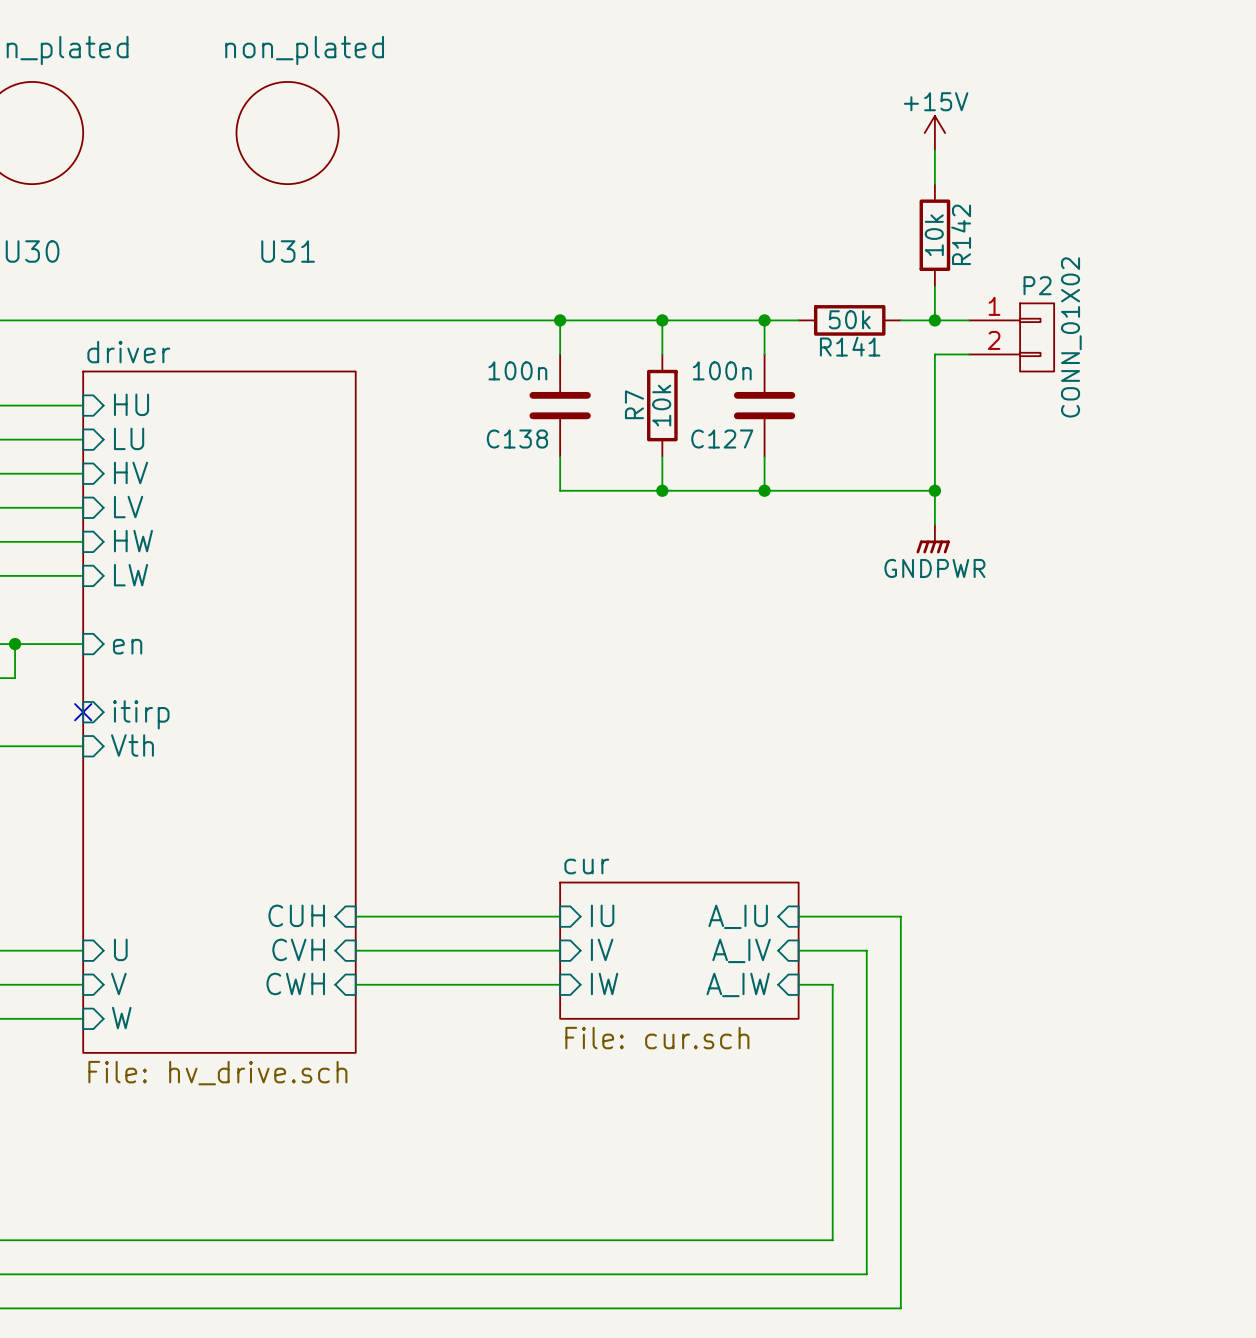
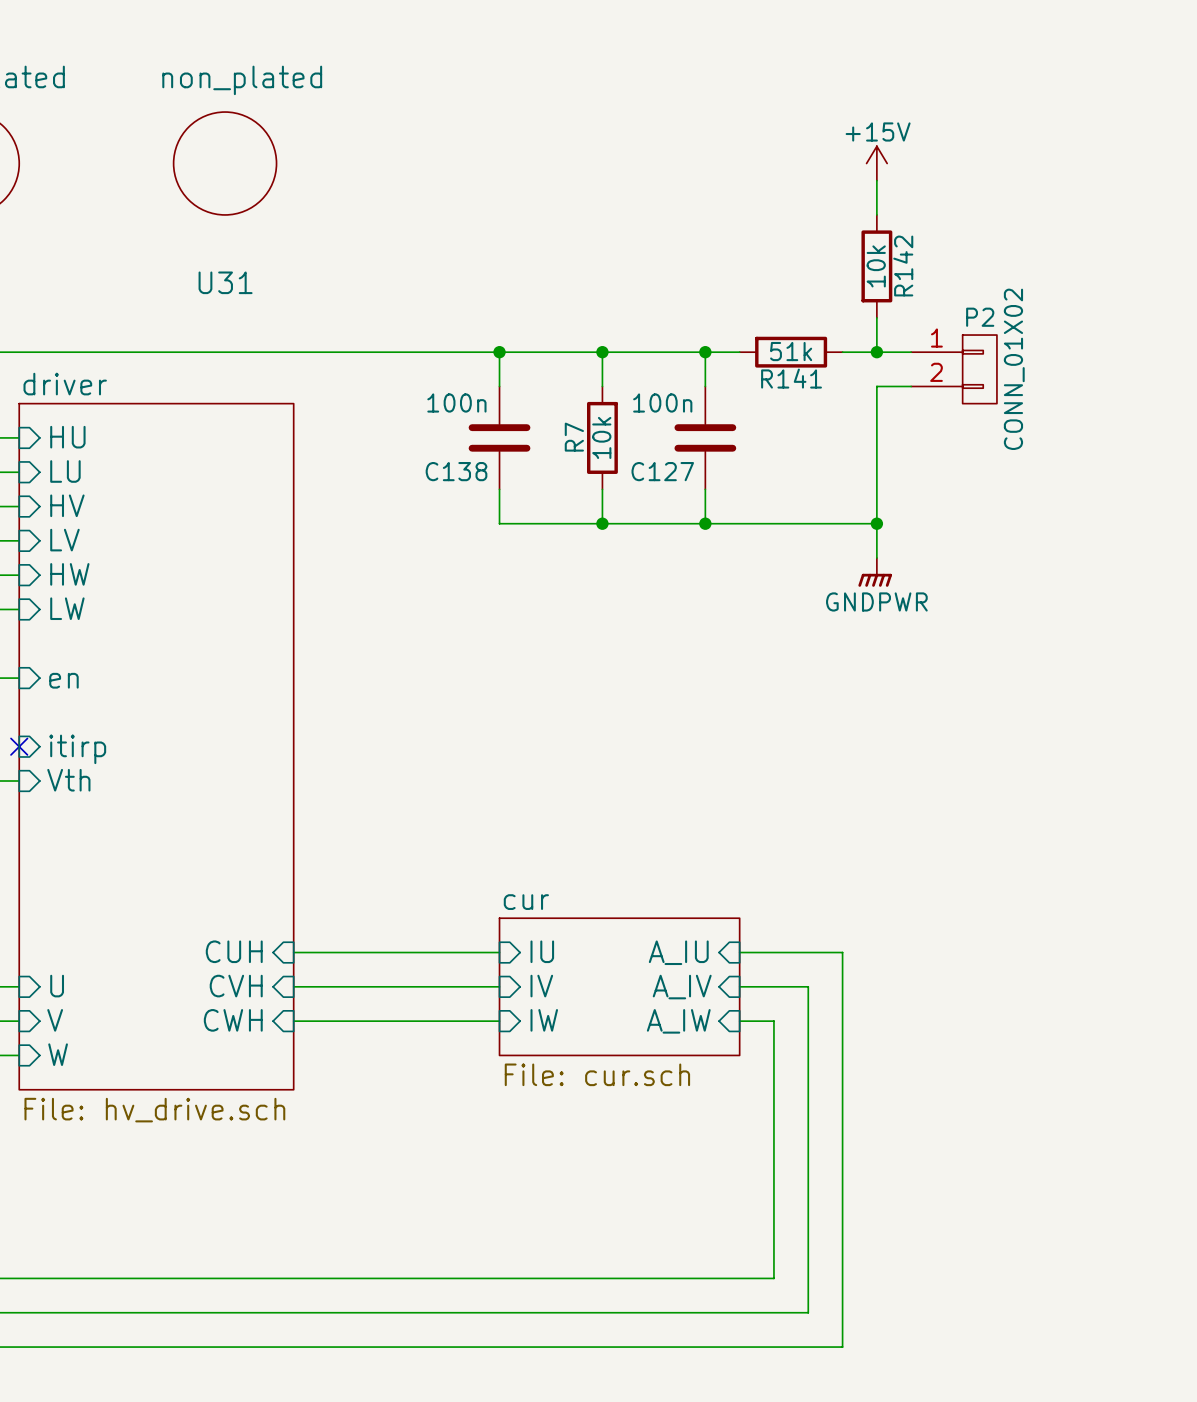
R141 value: 50k (849, 319) -> 51k (791, 351)

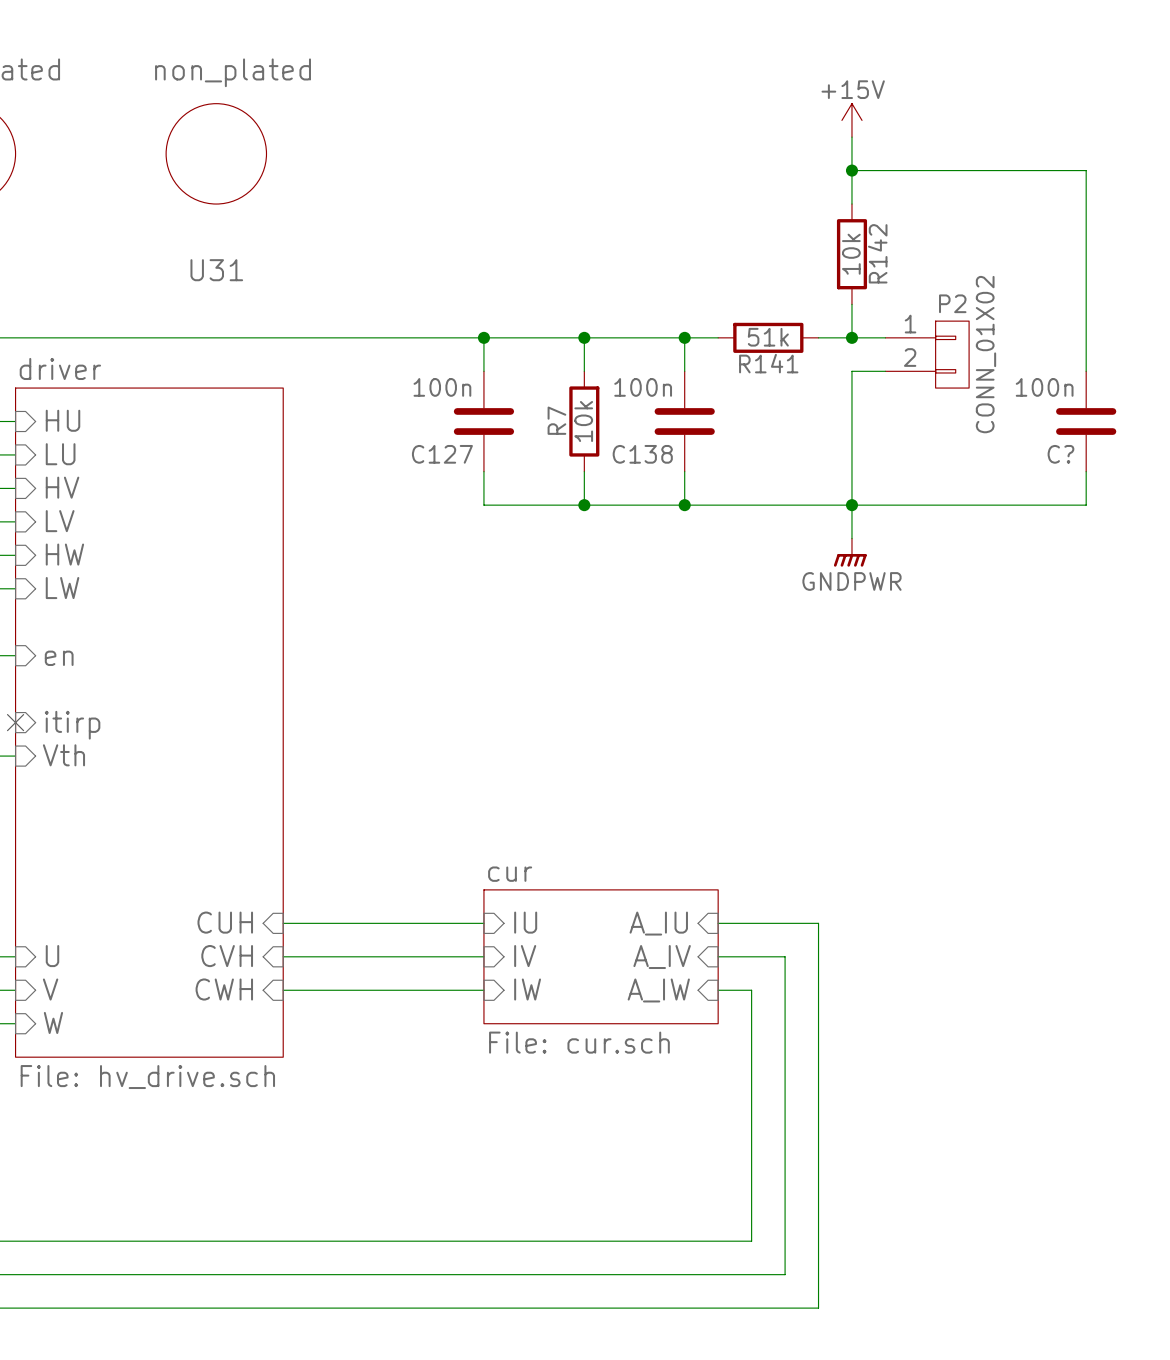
wire: none -> (851, 137) (851, 170) (1086, 170) (1086, 371)
power symbol position: +15V (876, 163) -> +15V (851, 120)
junction: none -> (851, 170)
C?: none -> 100n (1086, 421)
C138 name: C138 (456, 471) -> C127 (442, 454)
C127 name: C127 (662, 471) -> C138 (642, 454)
wire: none -> (1086, 471) (1086, 505) (851, 505)

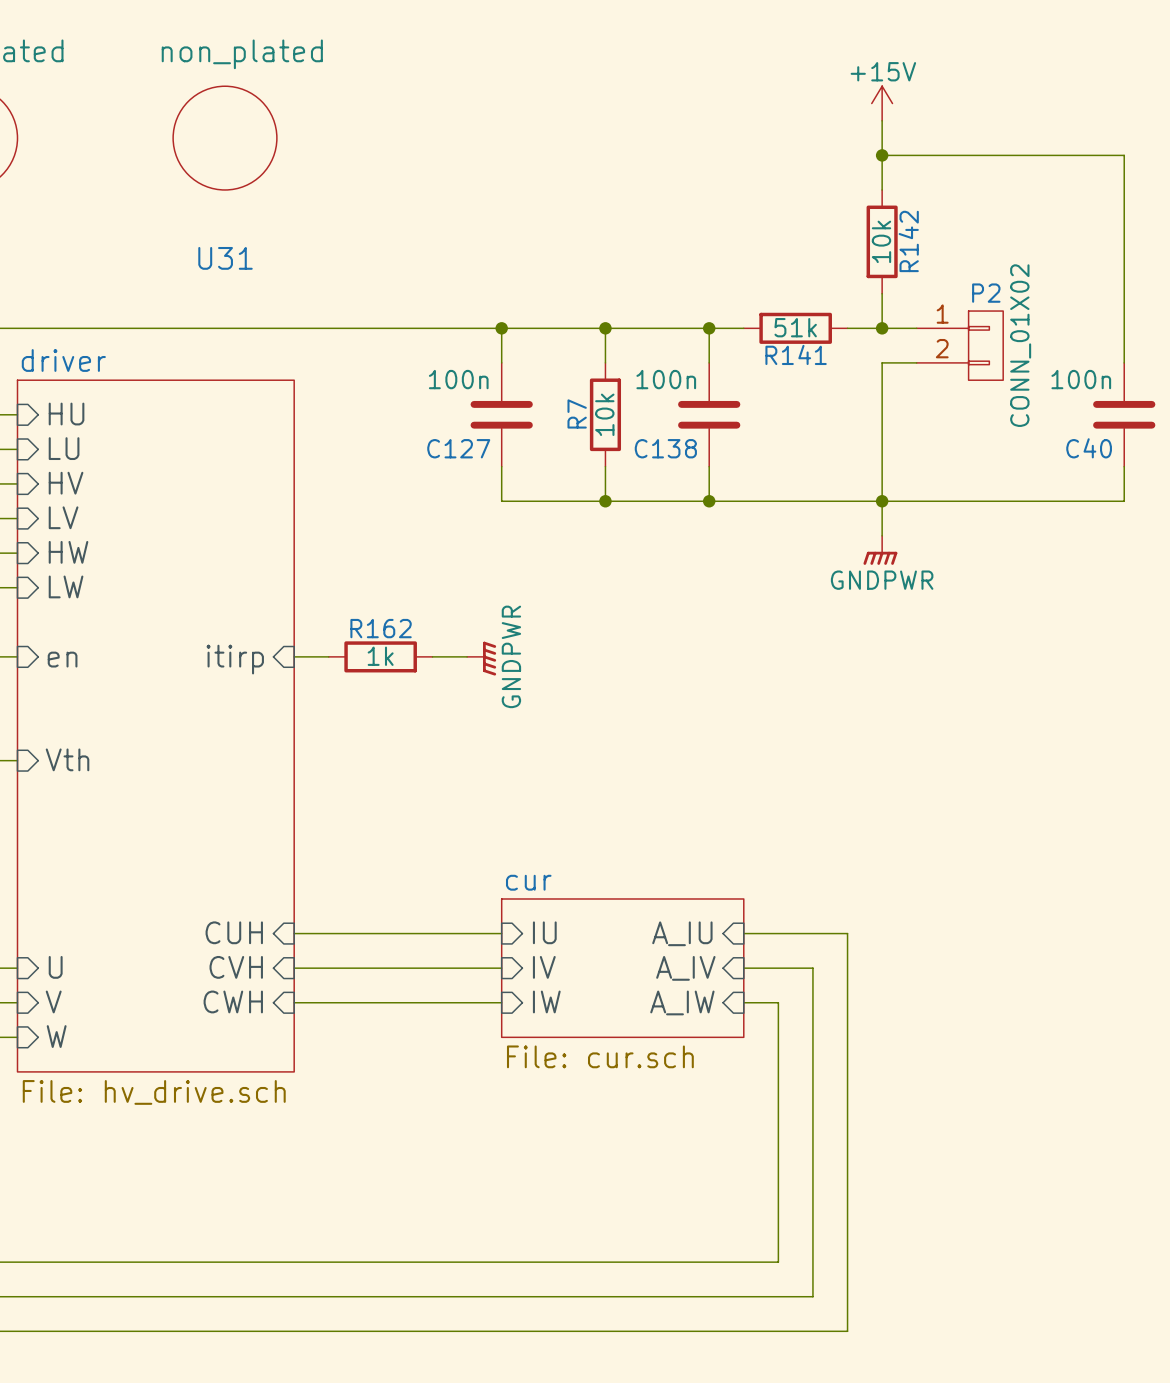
C? name: C? (1060, 454) -> C40 (1089, 448)
wire: none -> (294, 656) (328, 656)
R162: none -> 1k (380, 656)
wire: none -> (432, 656) (467, 656)
power symbol: none -> GNDPWR (481, 658)
no-connect mark: (15, 722) -> none
sheet pin rotation: 0° (72, 725) -> 180° (235, 659)
sheet pin position: itirp (72, 725) -> itirp (235, 659)

